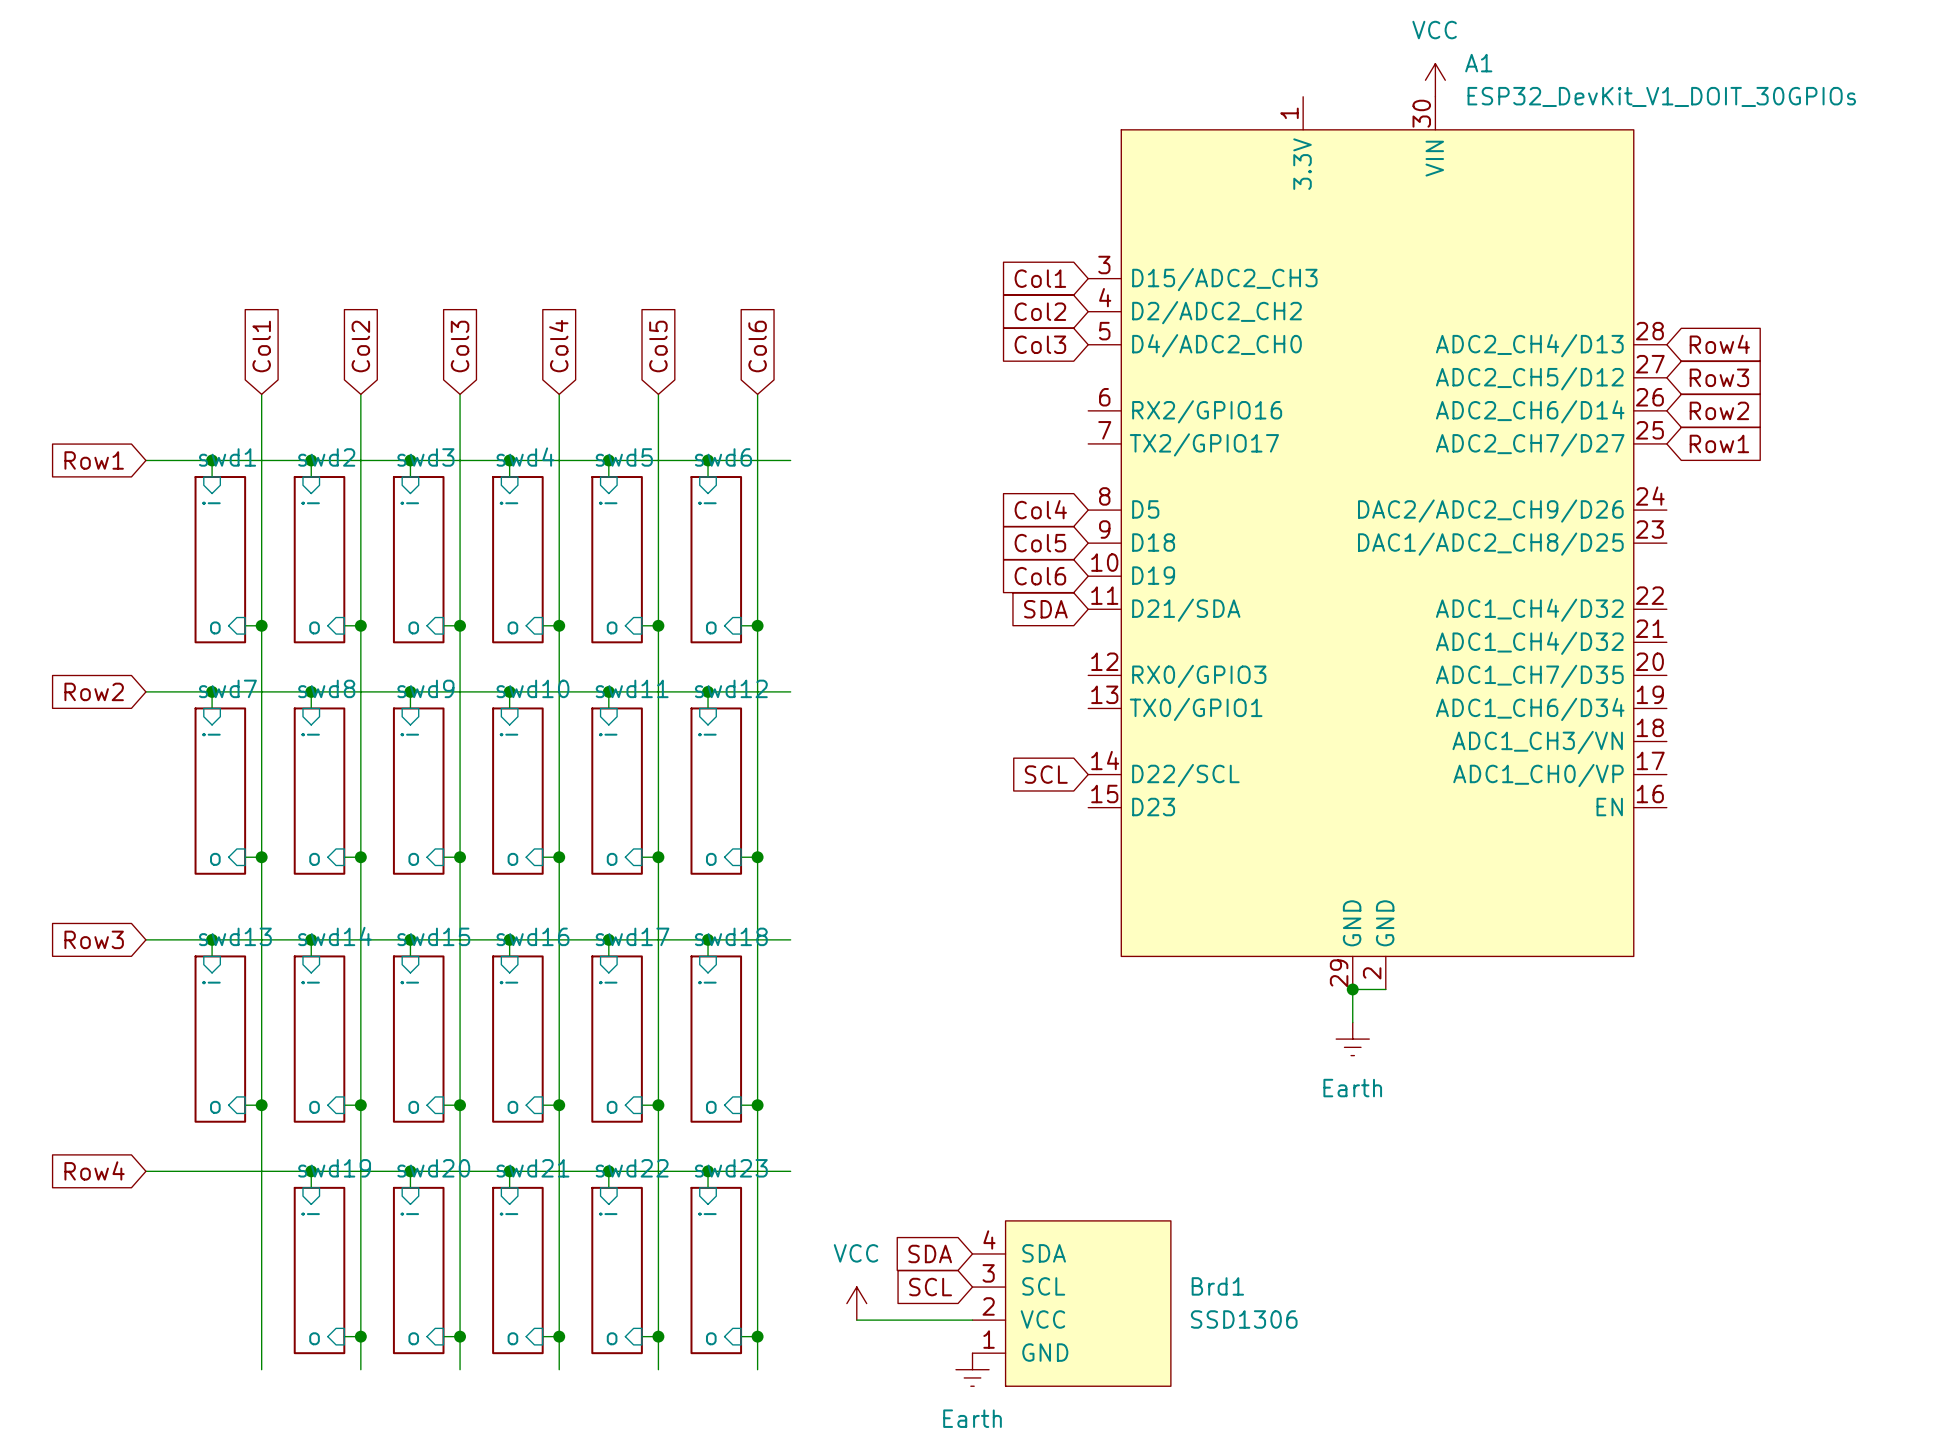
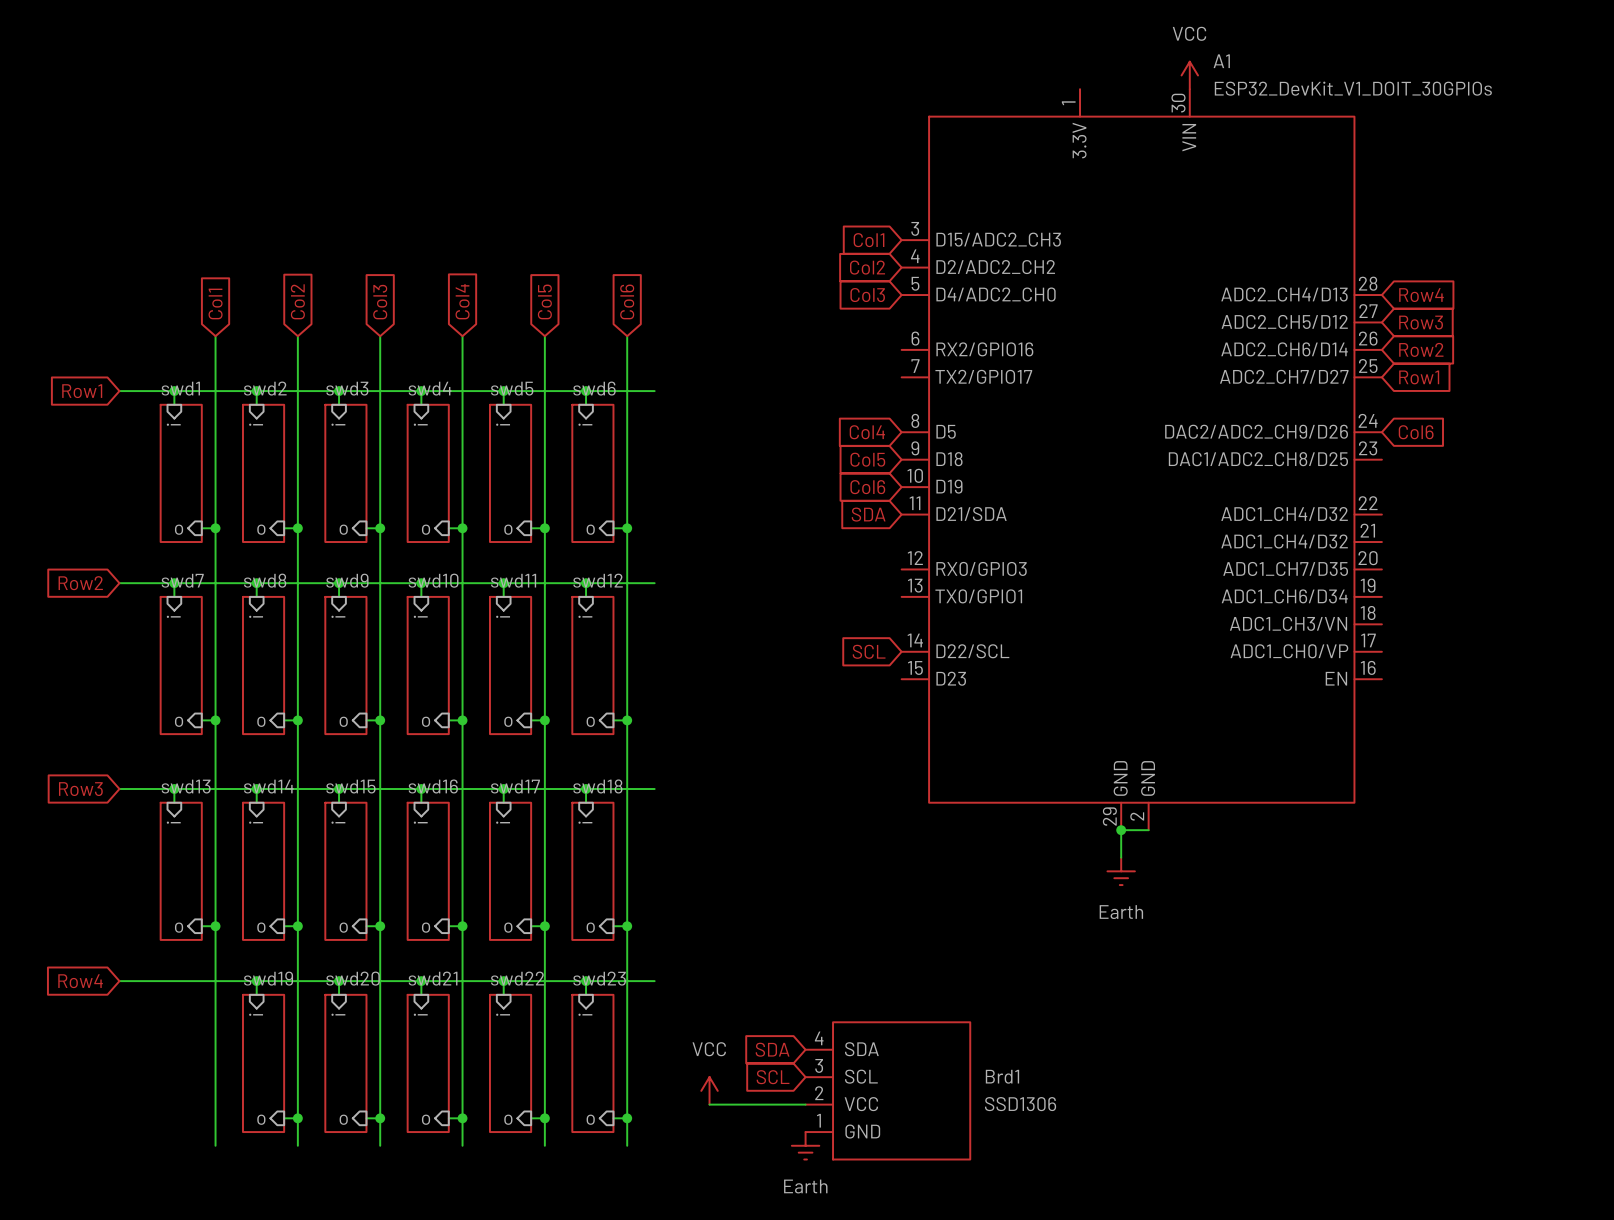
global label: none -> Col6 (1416, 432)

